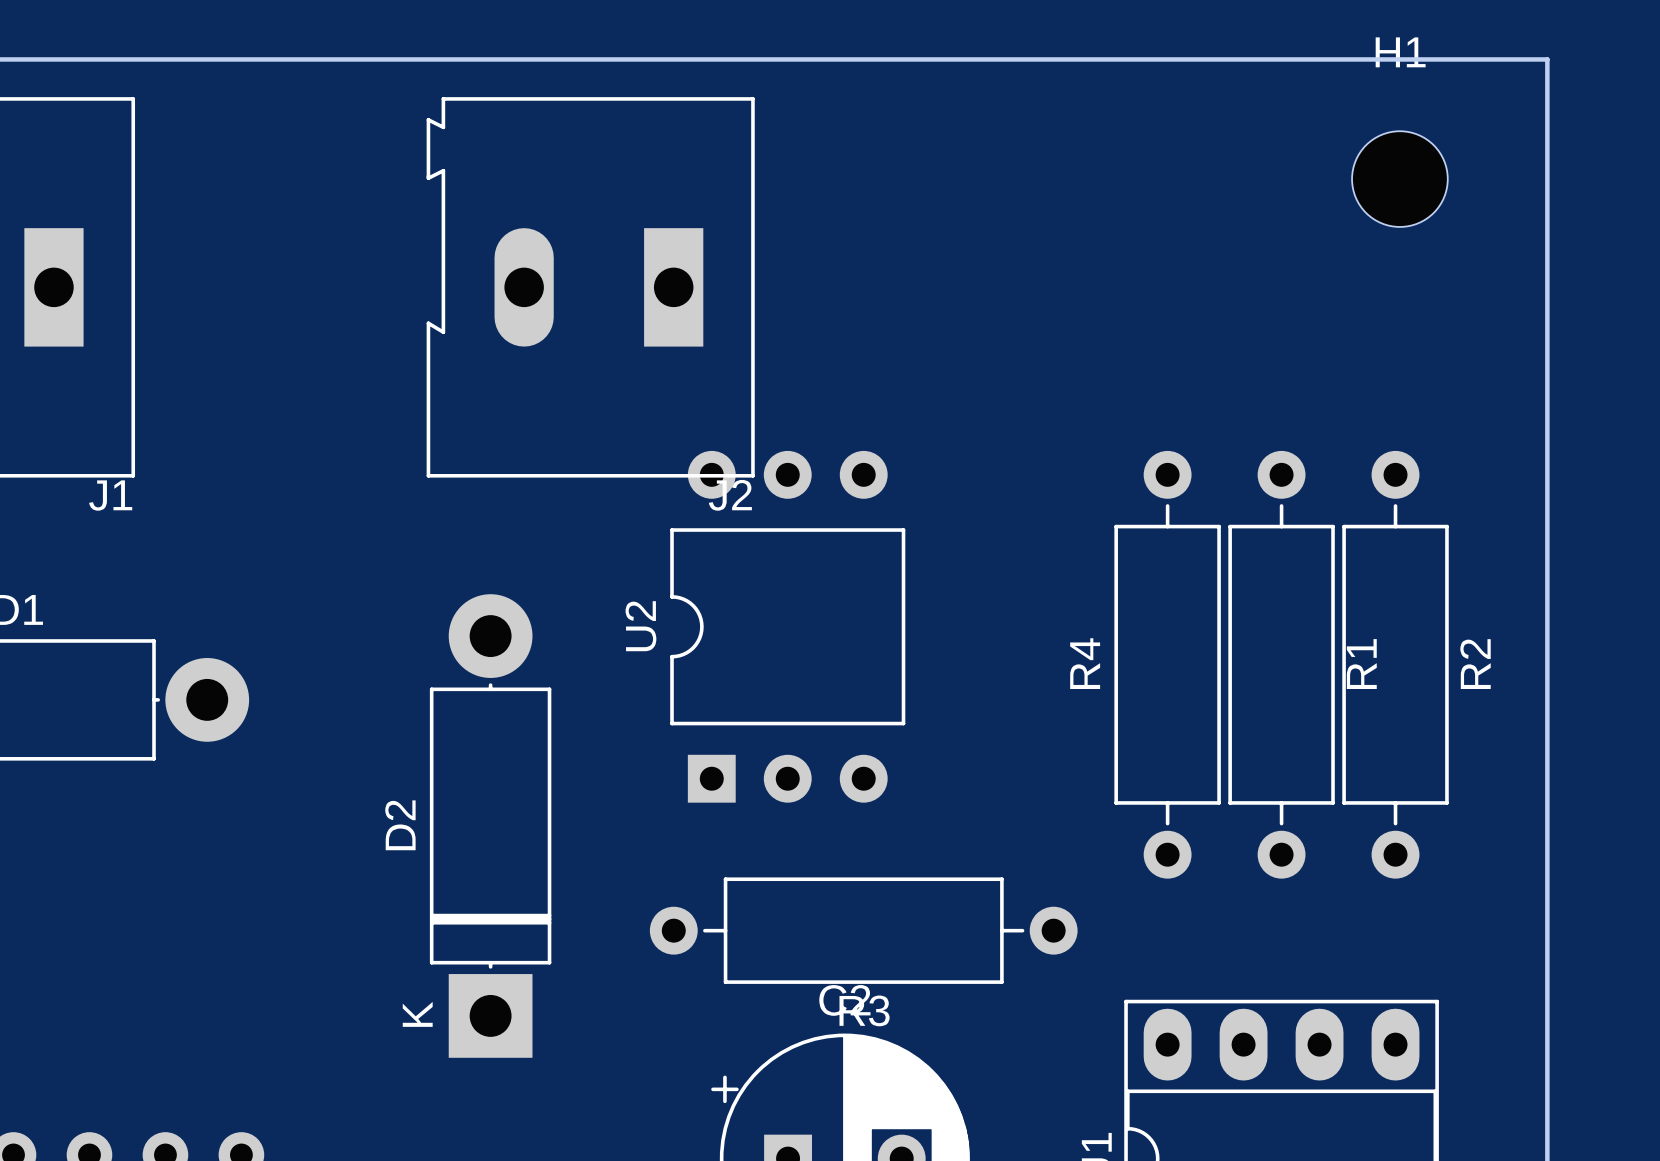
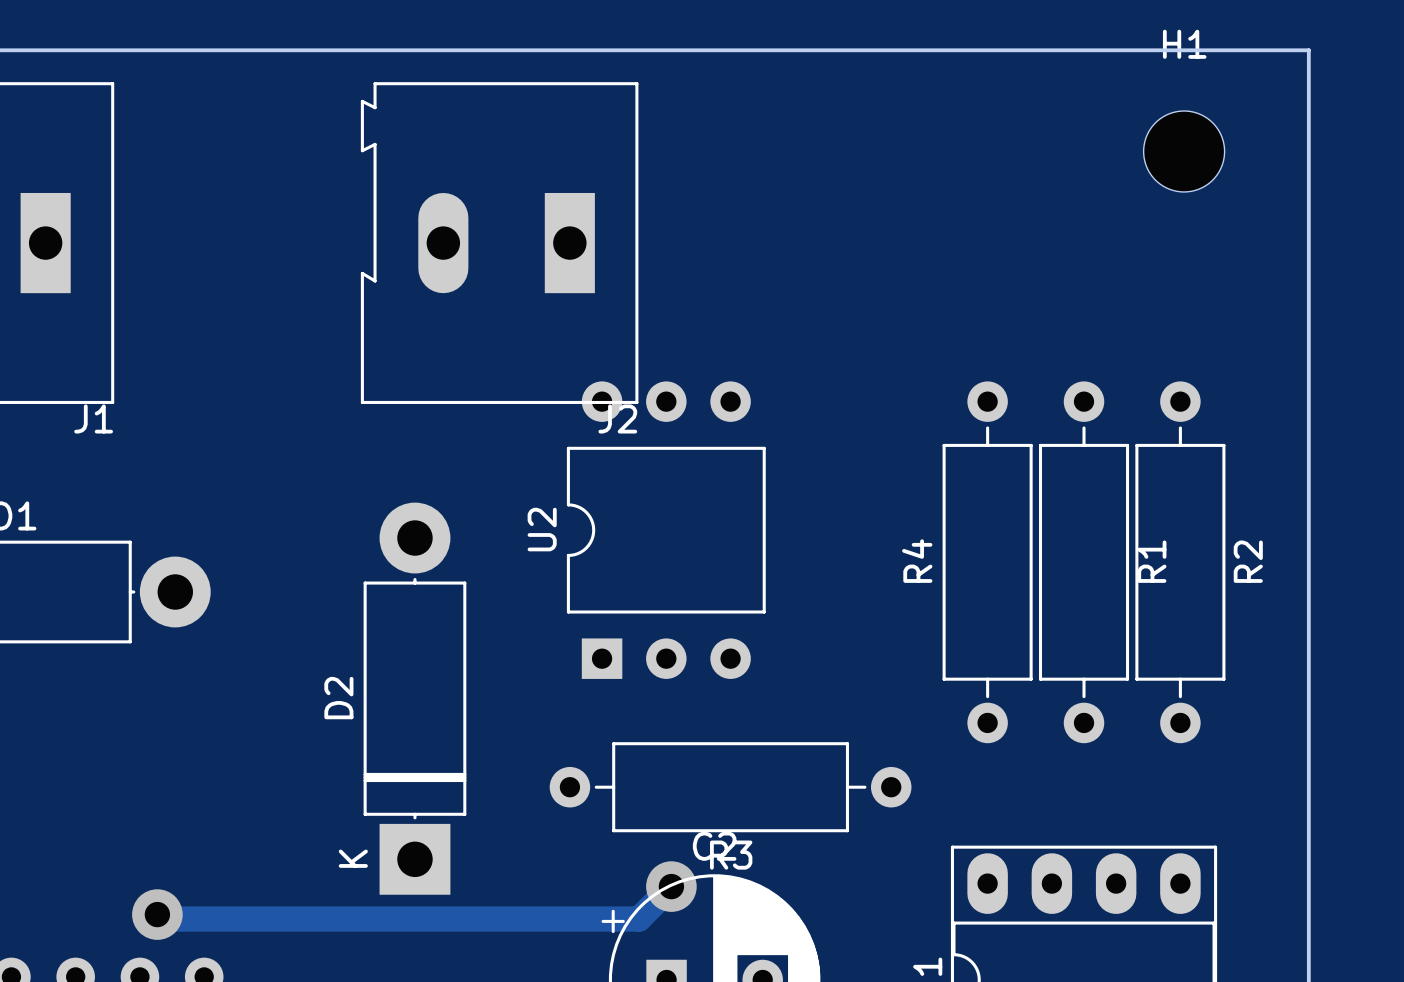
track: none -> (671, 886) (638, 919) (161, 919) (157, 914)
via: none -> (671, 886)
via: none -> (157, 914)

